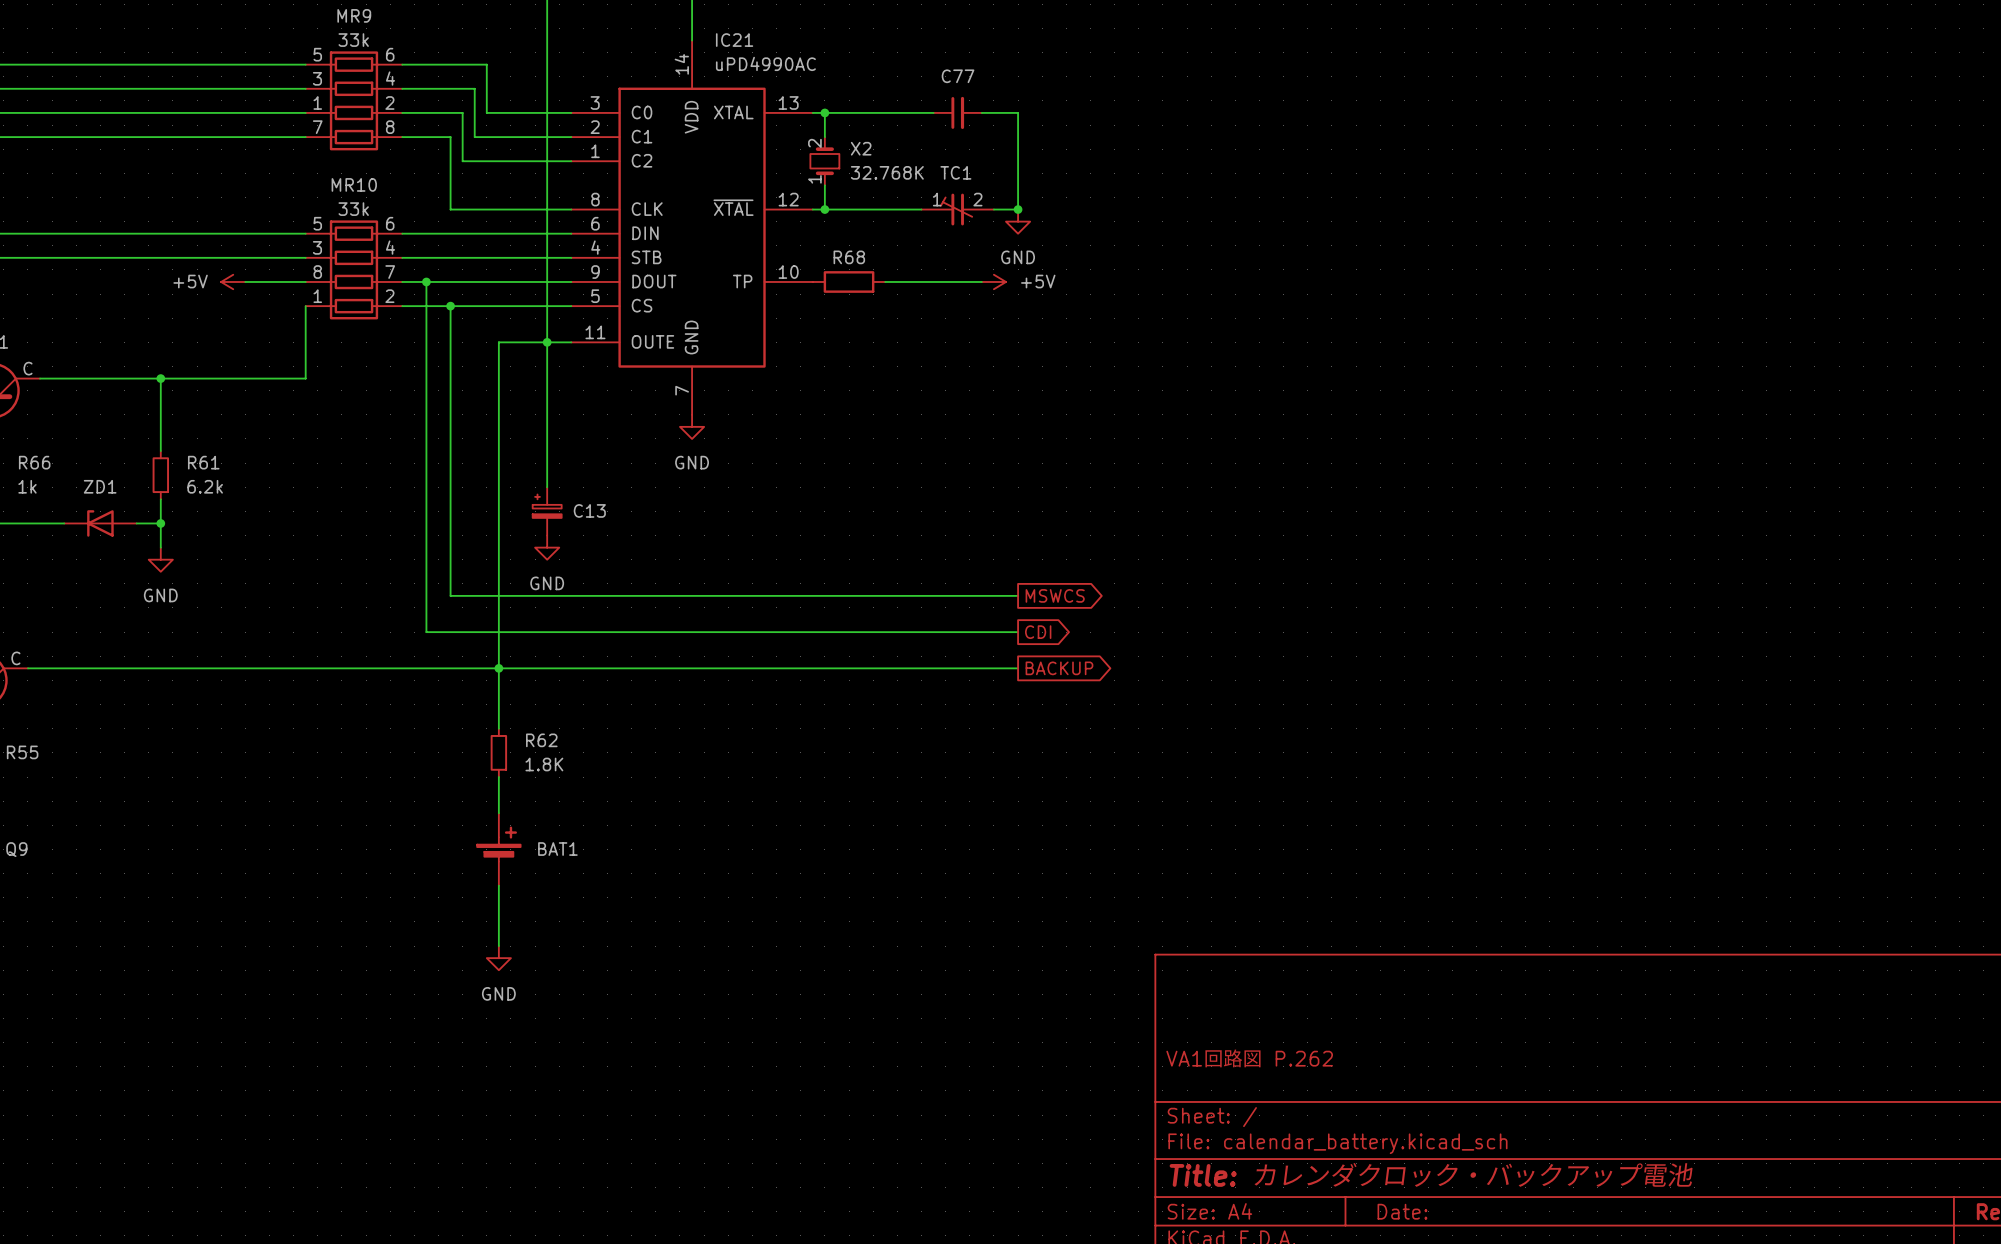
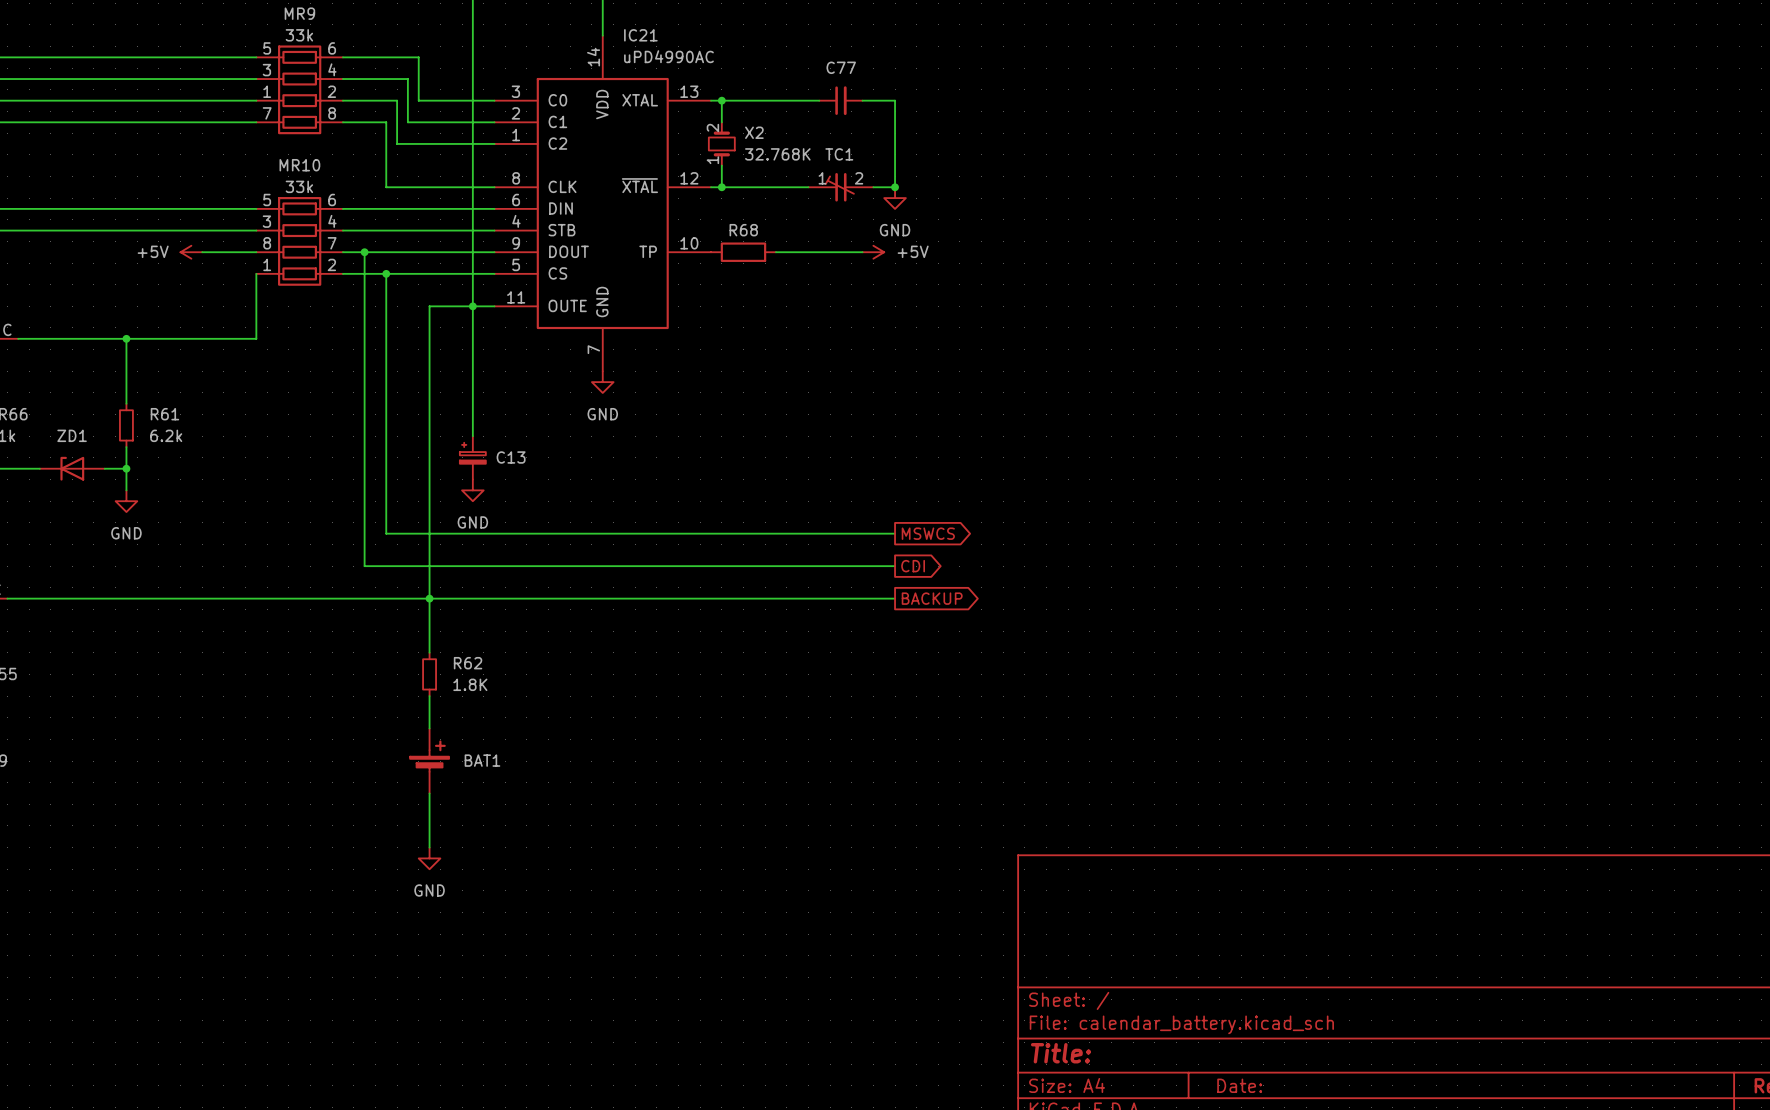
title block: VA1回路図 P.262 (1249, 1058) -> none
title block: Title: カレンダクロック・バックアップ電池 (1432, 1174) -> Title: (1061, 1053)

